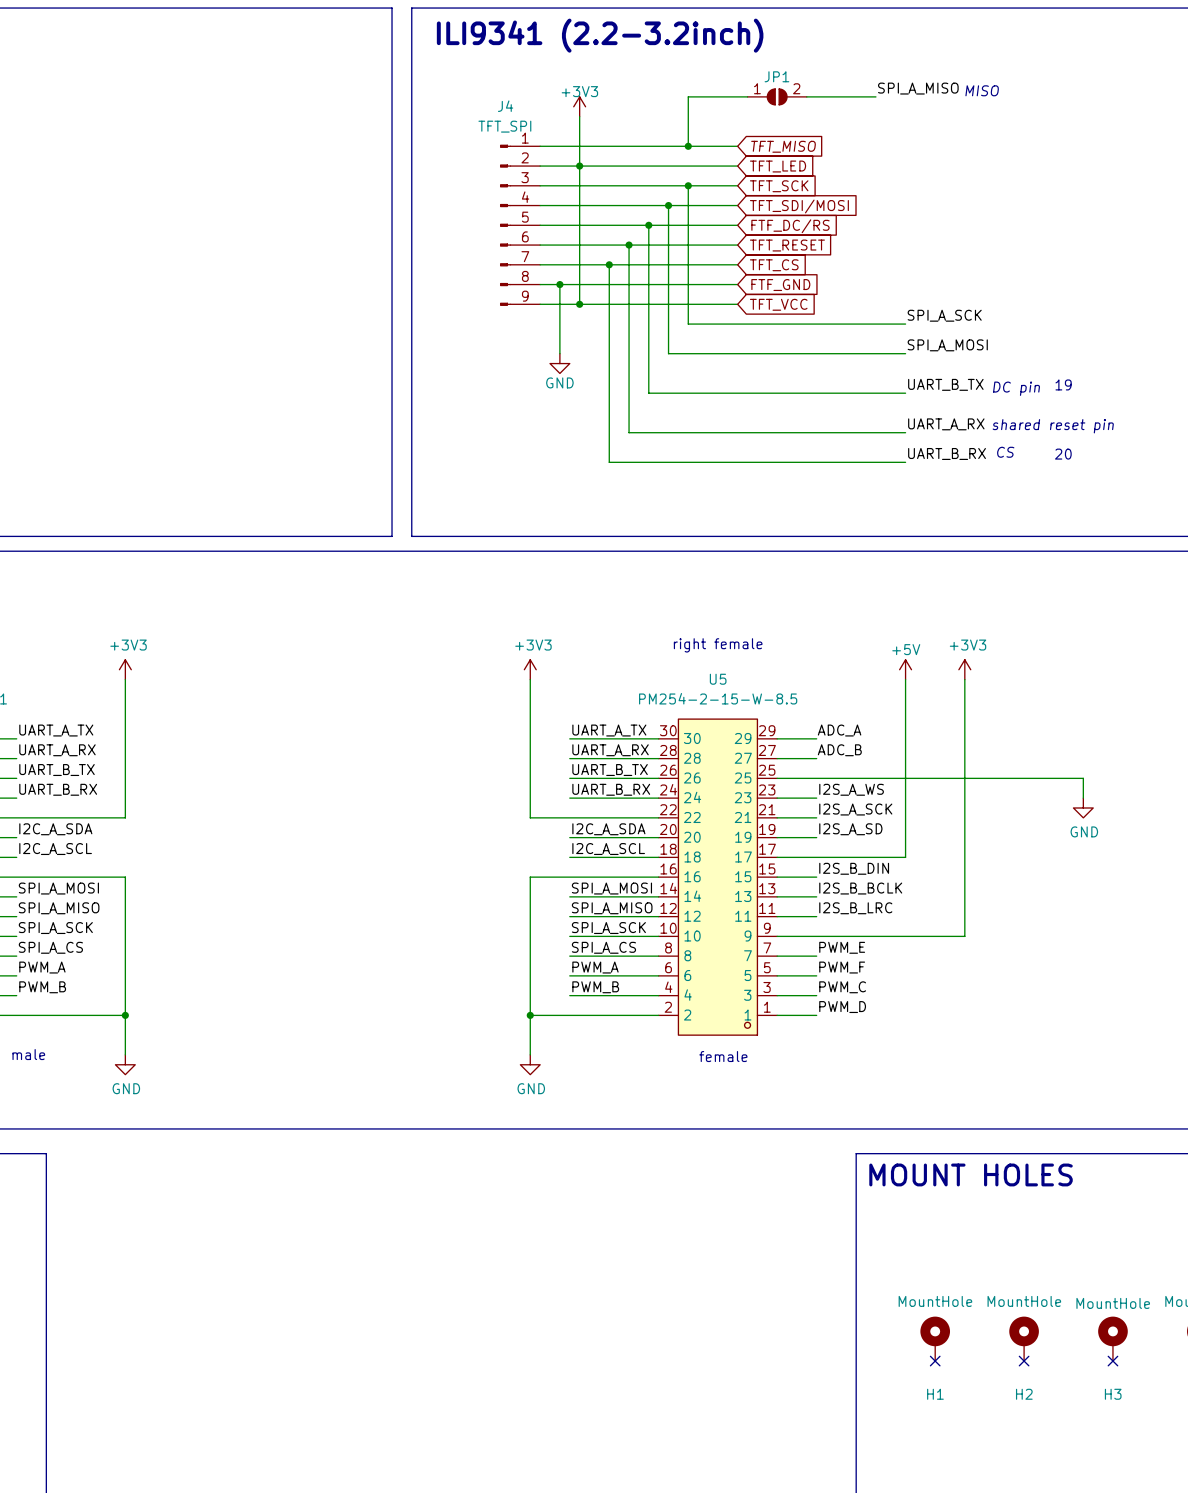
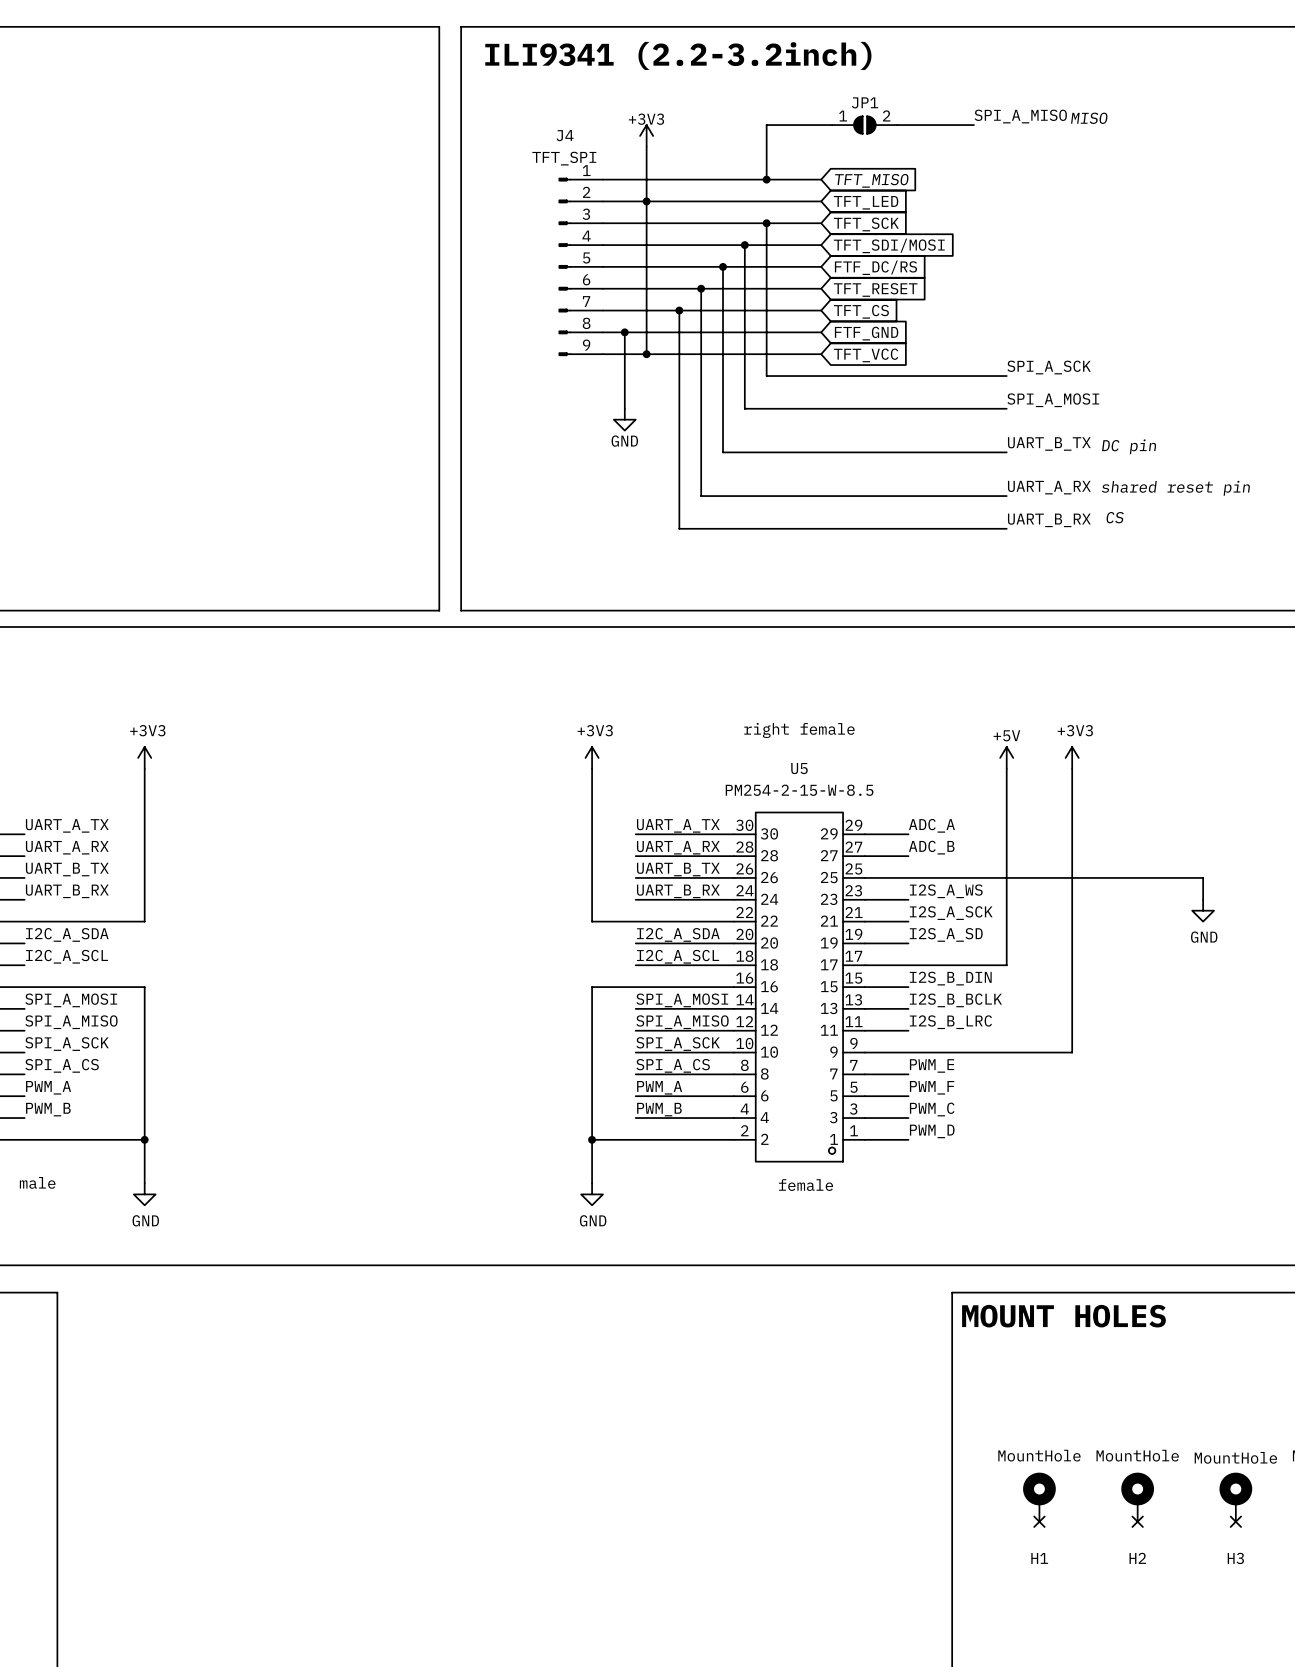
text: 19 (1063, 384) -> none
text: 20 (1063, 454) -> none

